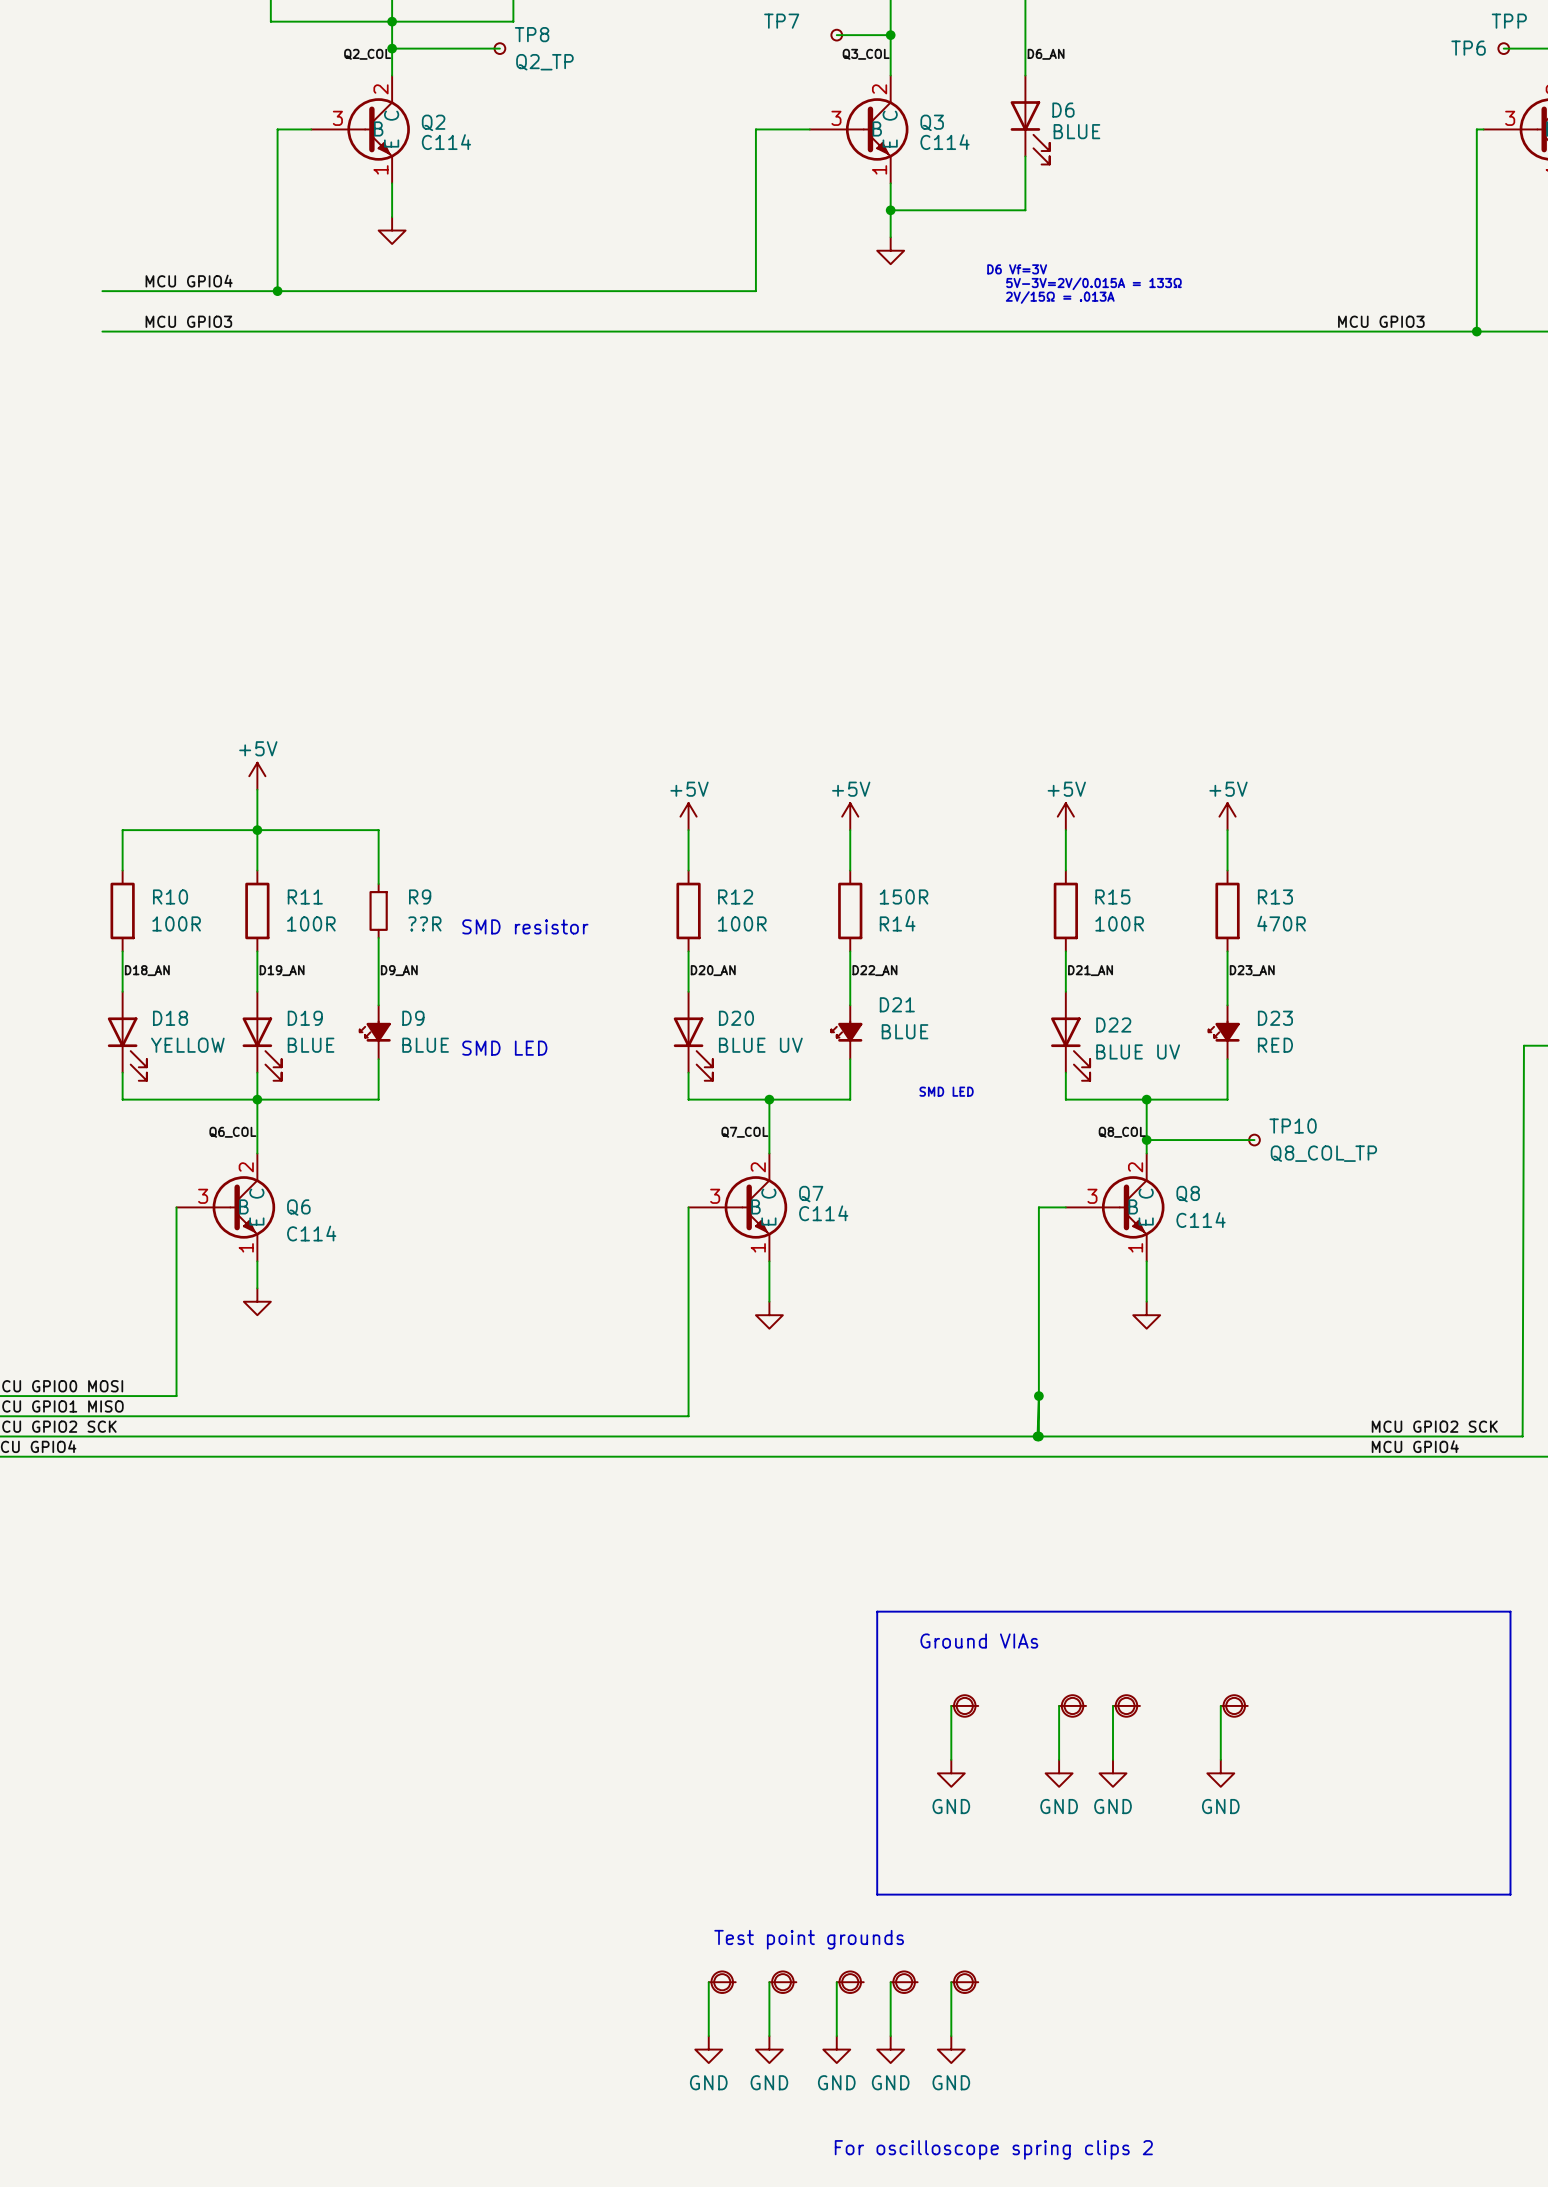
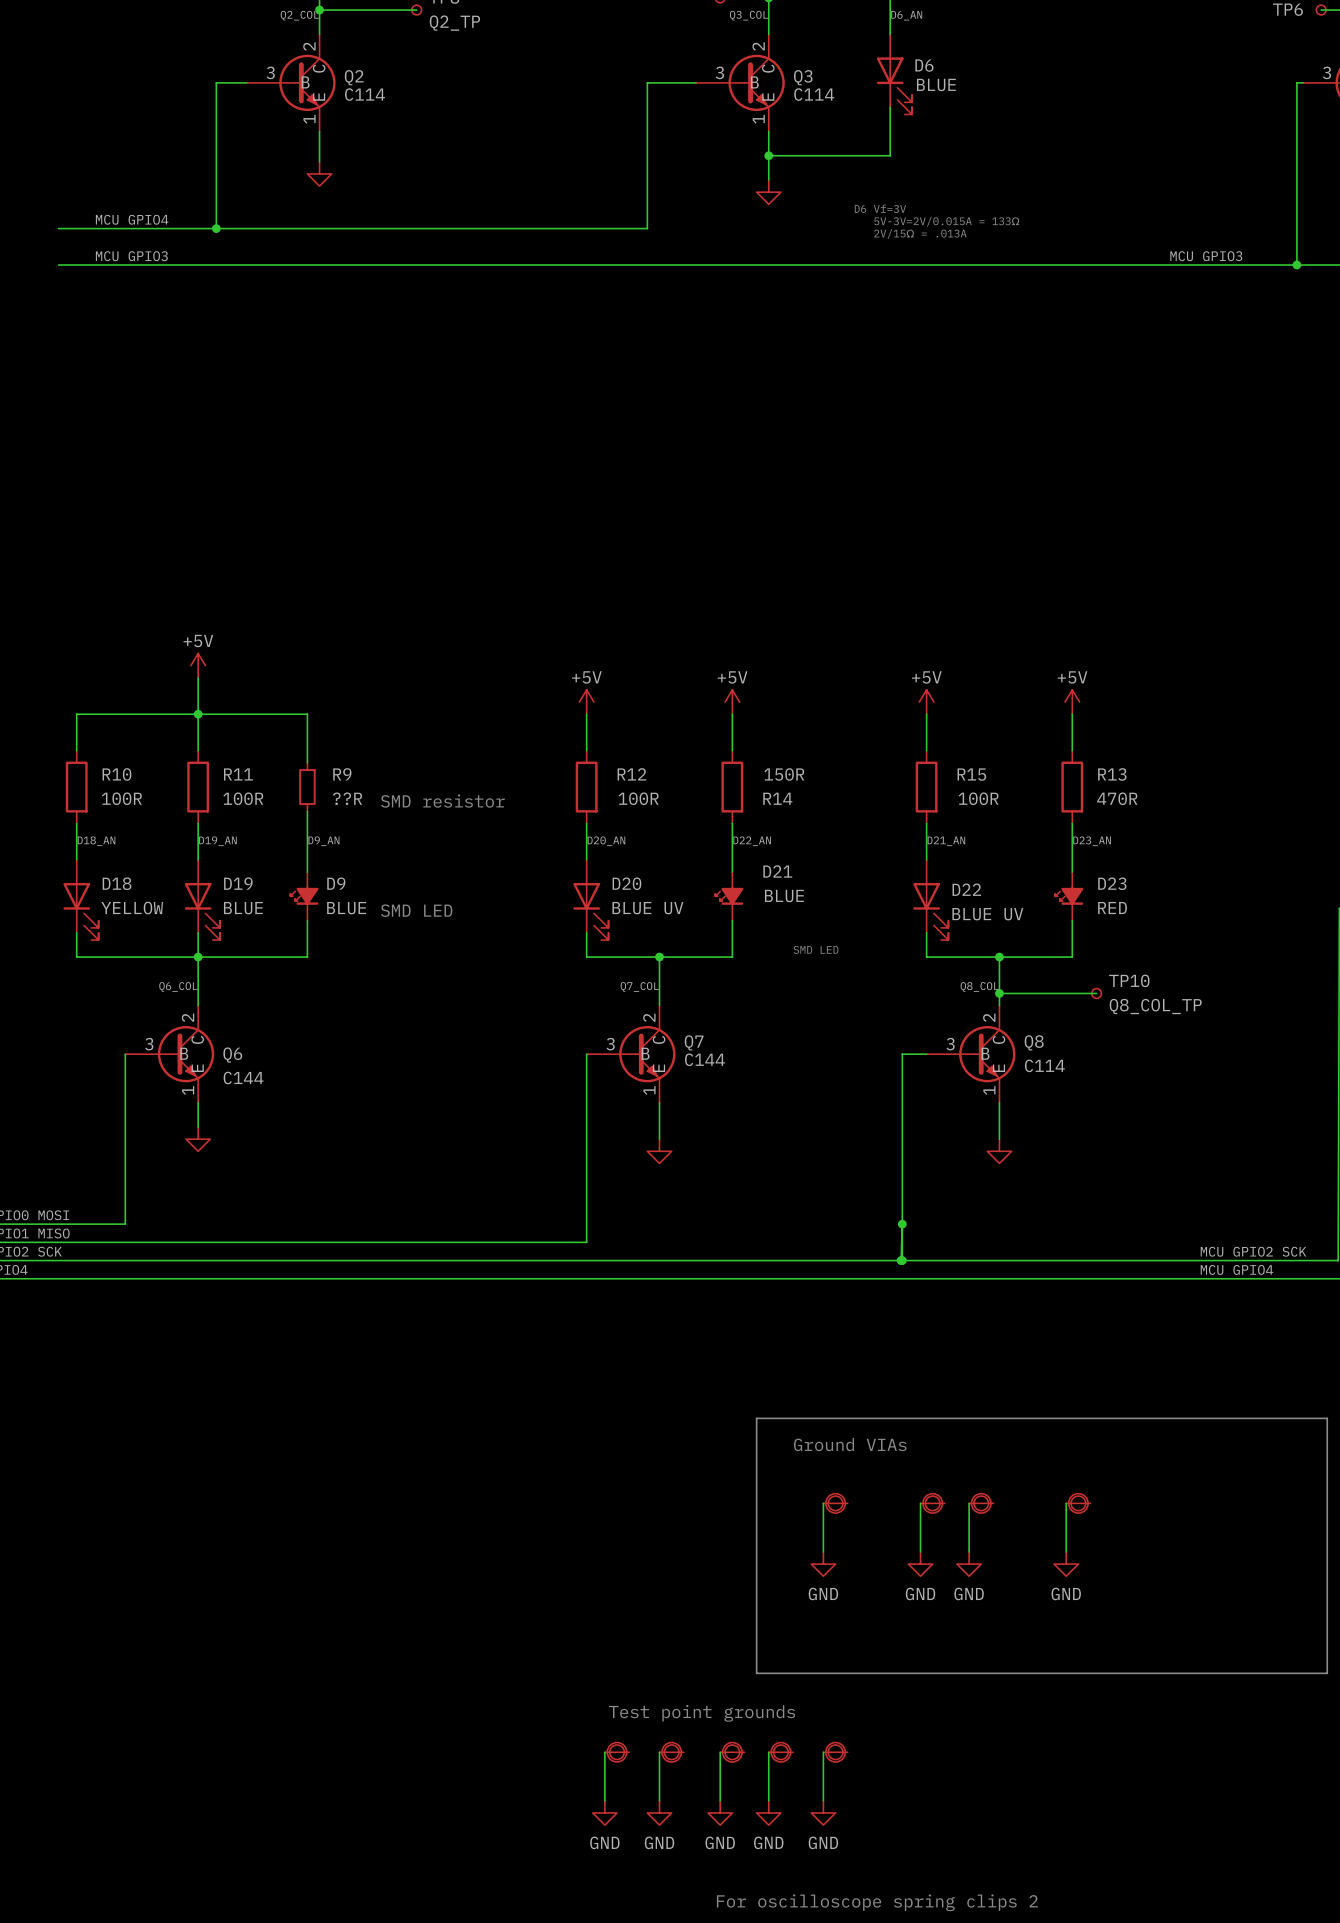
Q7 value: C114 (823, 1213) -> C144 (704, 1059)
Q6 value: C114 (311, 1233) -> C144 (243, 1077)

